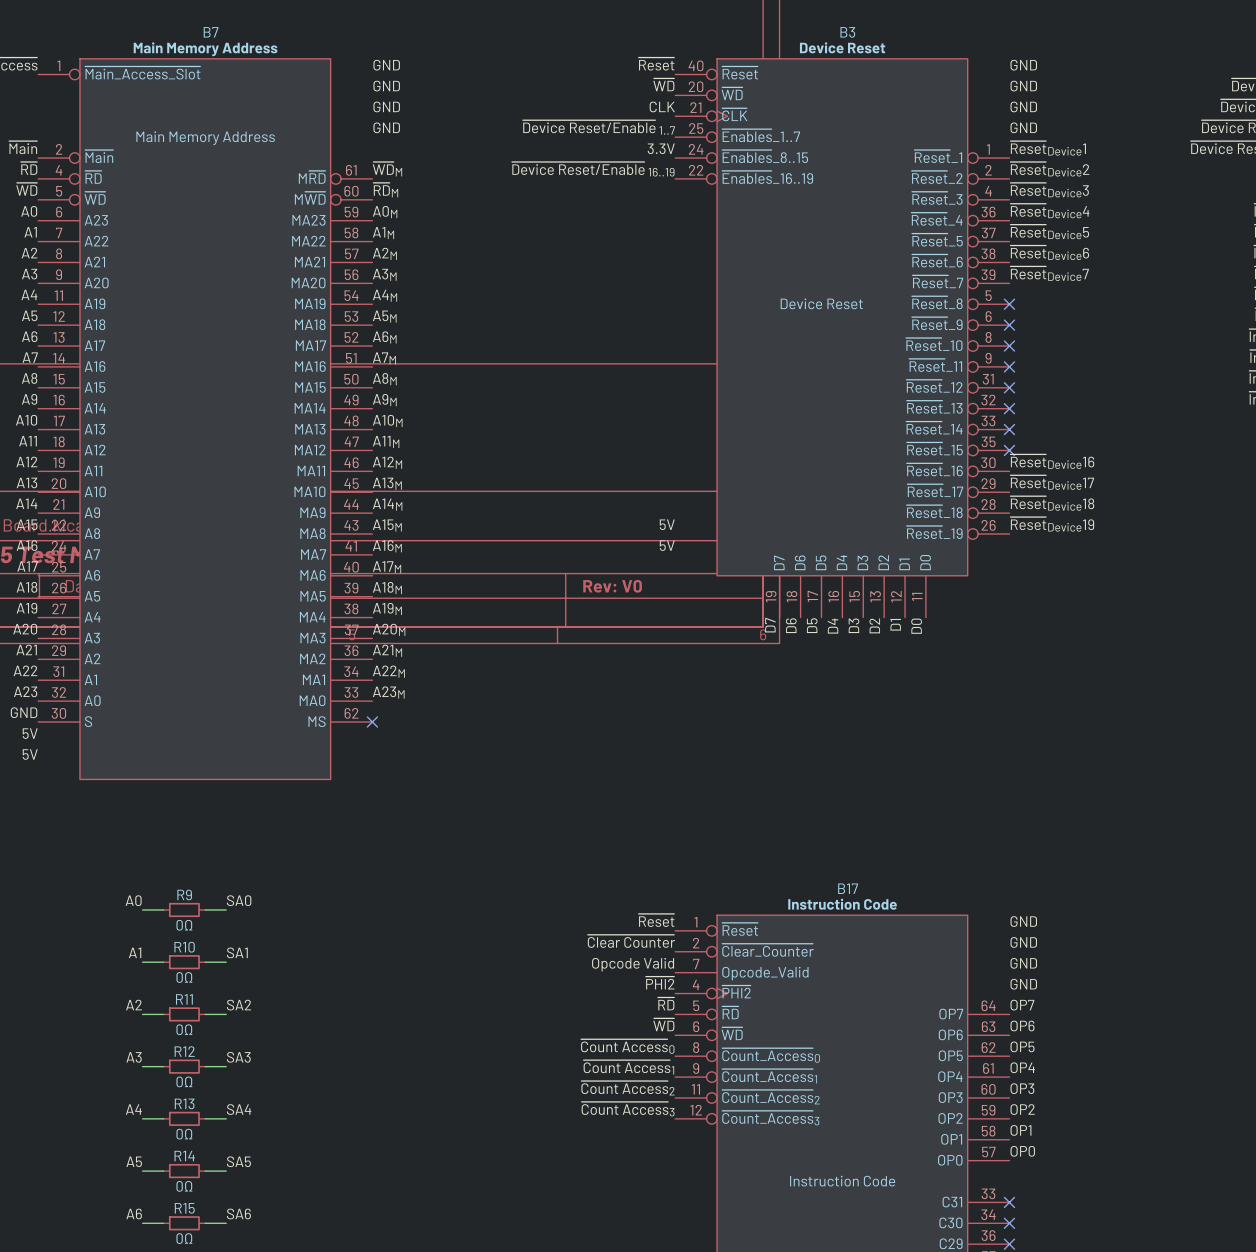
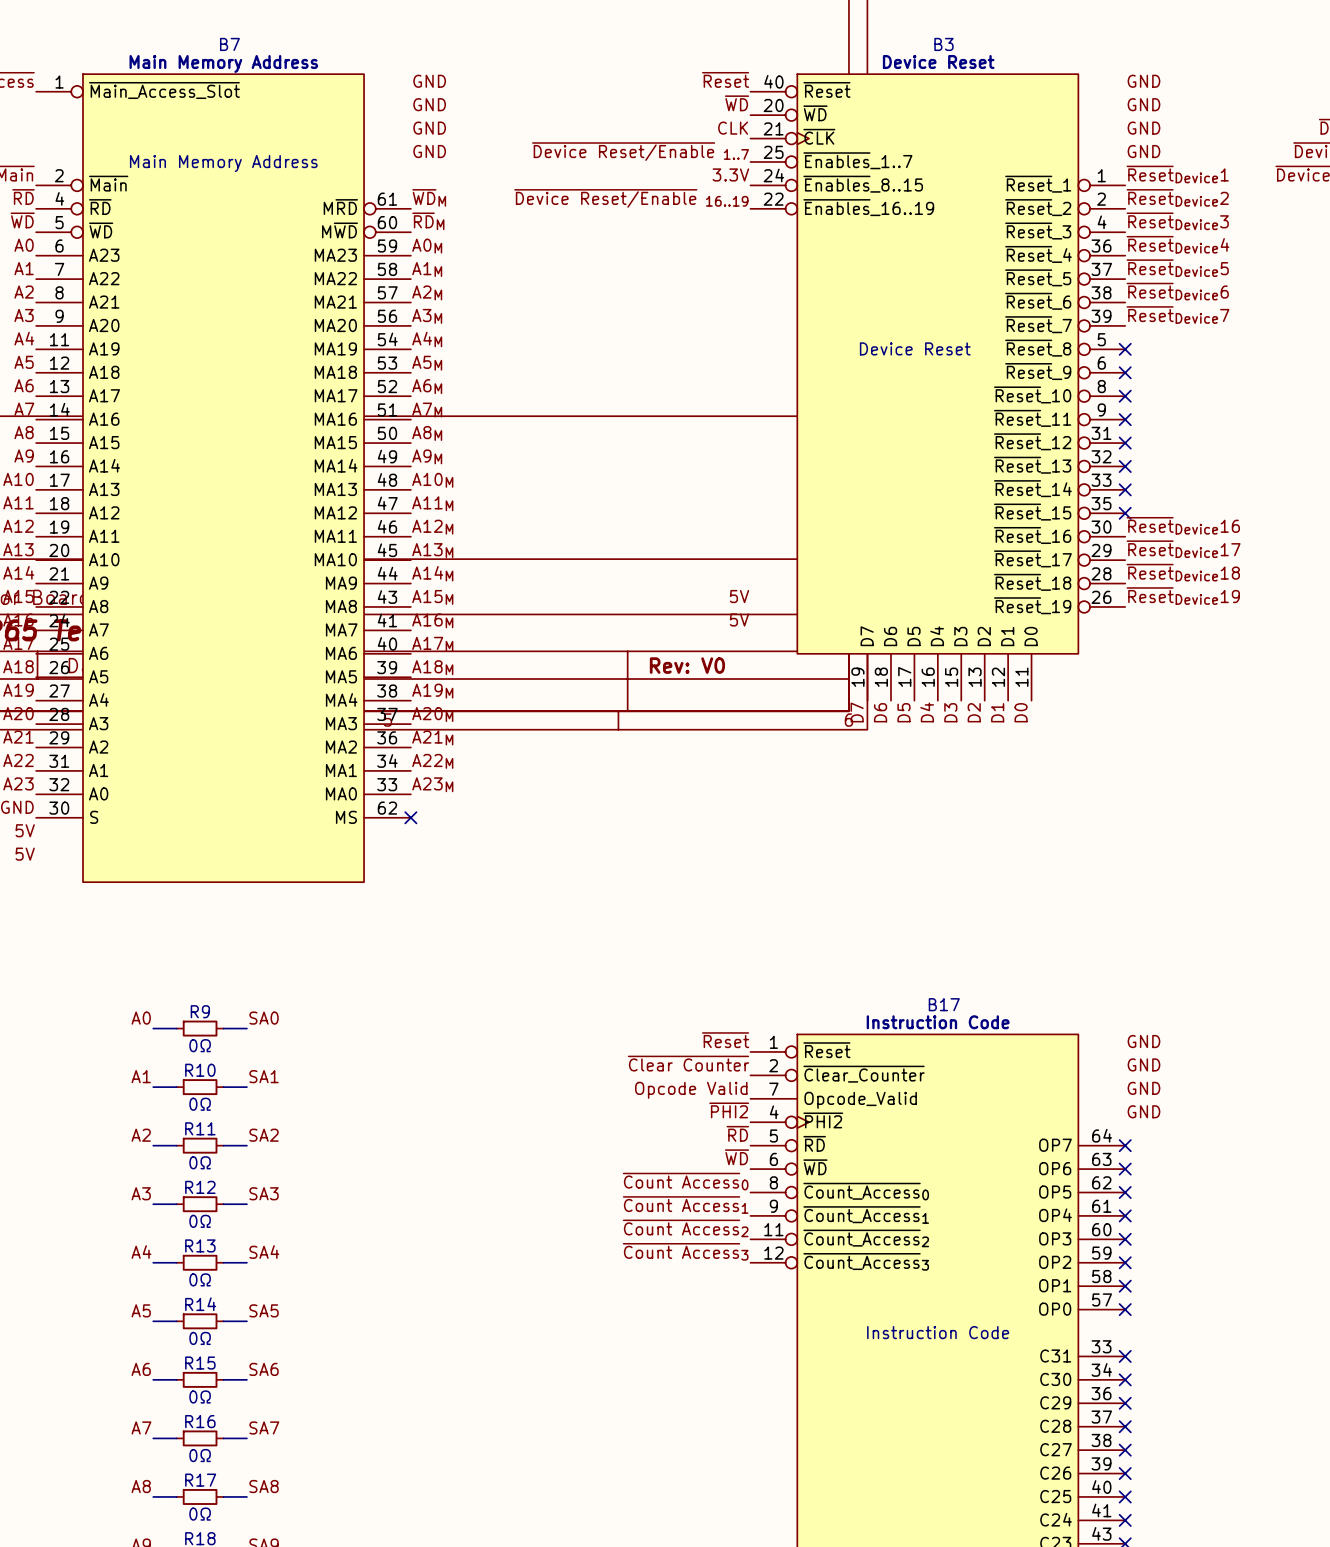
label: OP7 (1022, 1005) -> none
no-connect mark: none -> (1125, 1145)
label: OP6 (1022, 1025) -> none
no-connect mark: none -> (1125, 1169)
label: OP5 (1022, 1046) -> none
no-connect mark: none -> (1125, 1192)
label: OP4 (1022, 1067) -> none
no-connect mark: none -> (1125, 1215)
label: OP3 (1022, 1088) -> none
no-connect mark: none -> (1125, 1239)
label: OP2 (1022, 1109) -> none
no-connect mark: none -> (1125, 1262)
label: OP1 (1020, 1130) -> none
no-connect mark: none -> (1125, 1286)
label: OP0 (1022, 1151) -> none
no-connect mark: none -> (1125, 1309)

